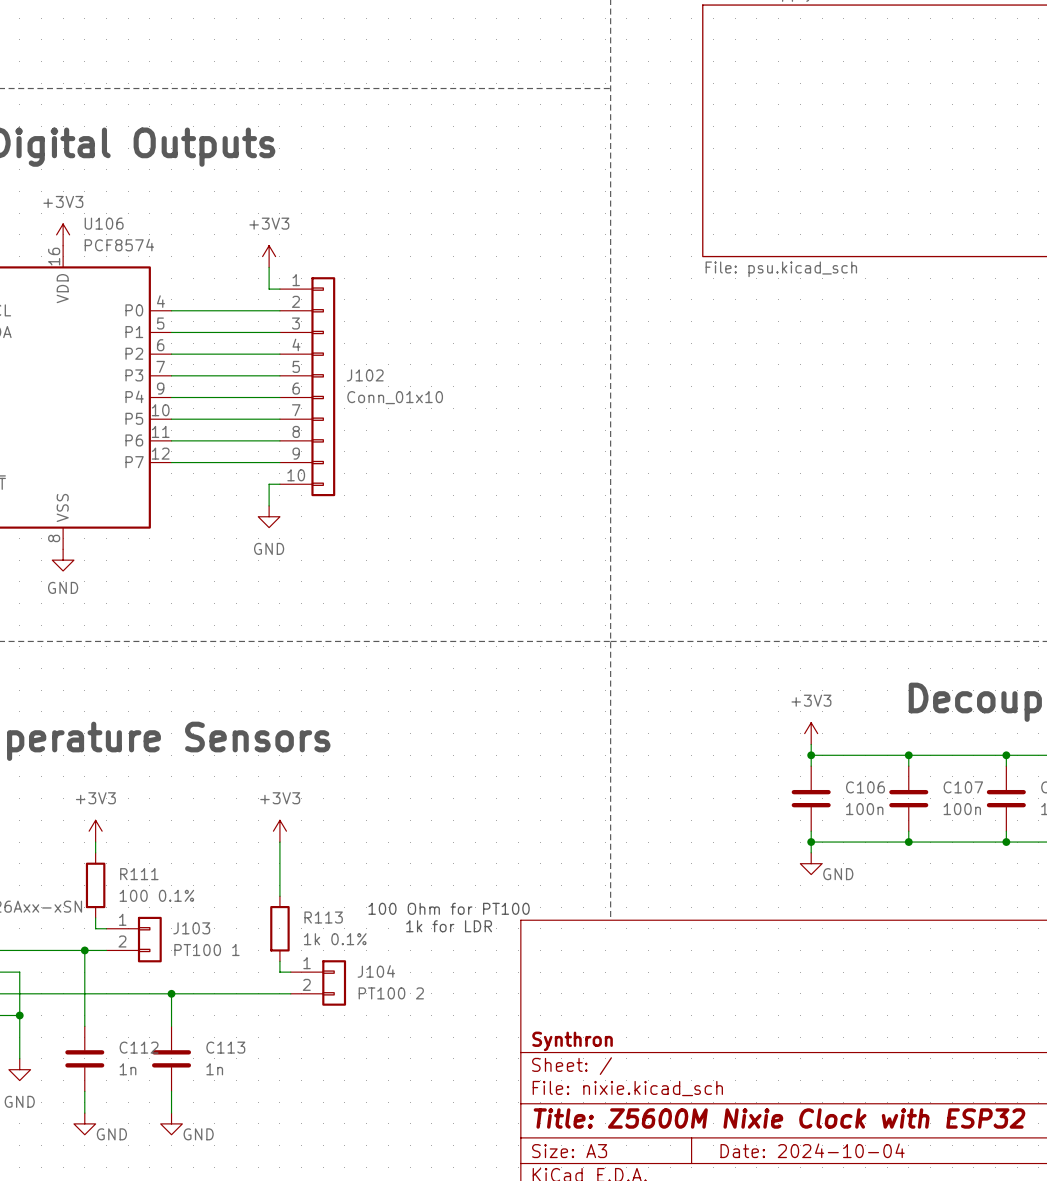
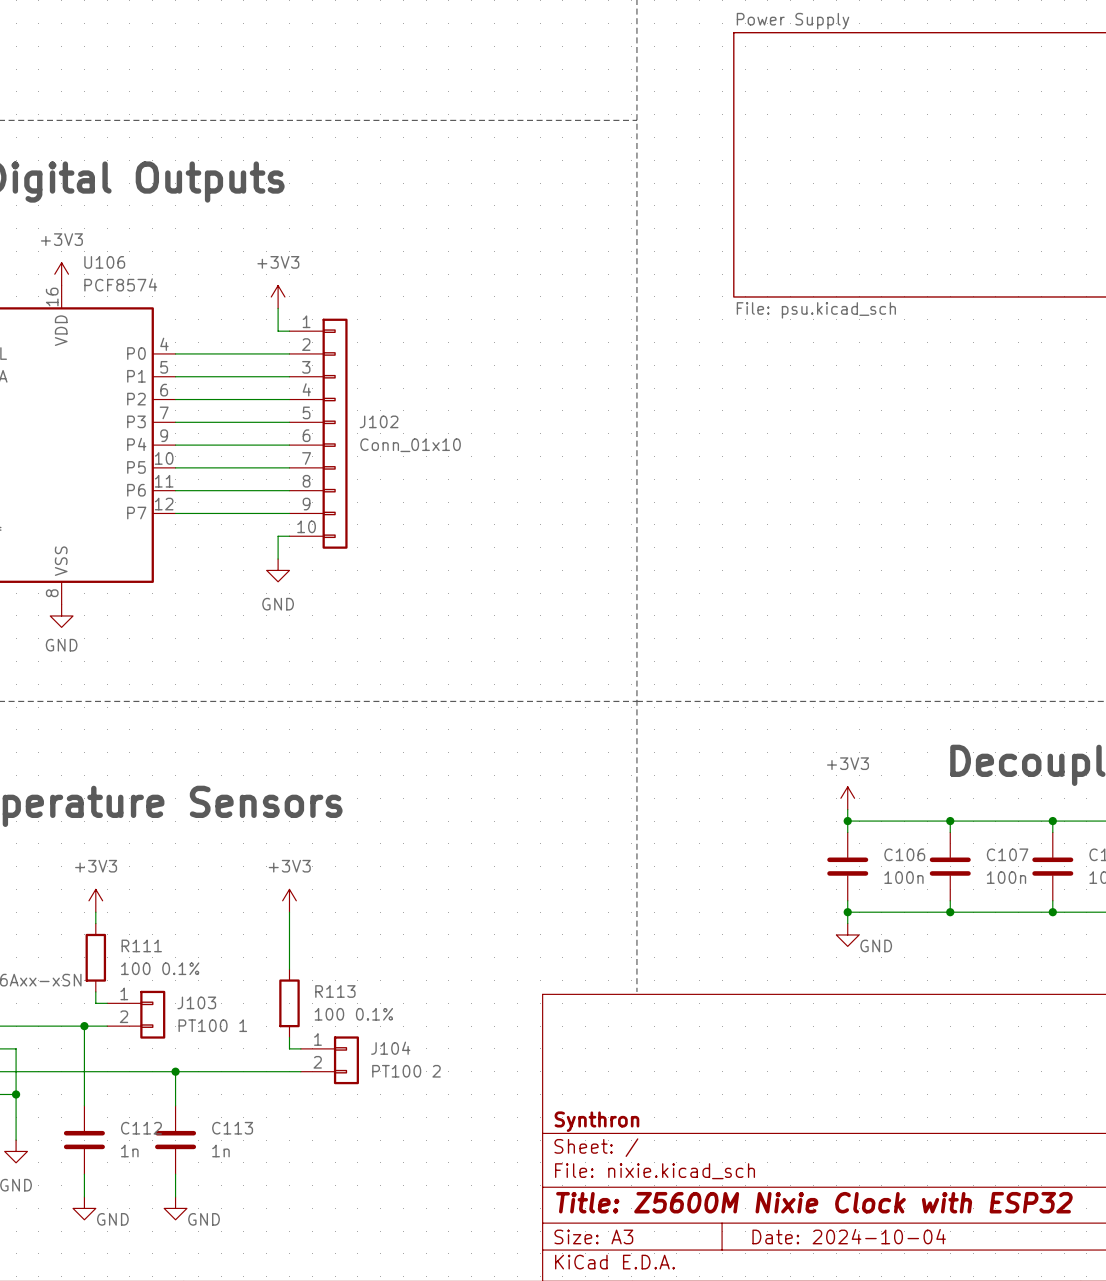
text: 100 Ohm for PT100 (449, 908) -> none
text: 1k for LDR (449, 926) -> none
R113 value: 1k 0.1% (335, 939) -> 100 0.1% (353, 1014)

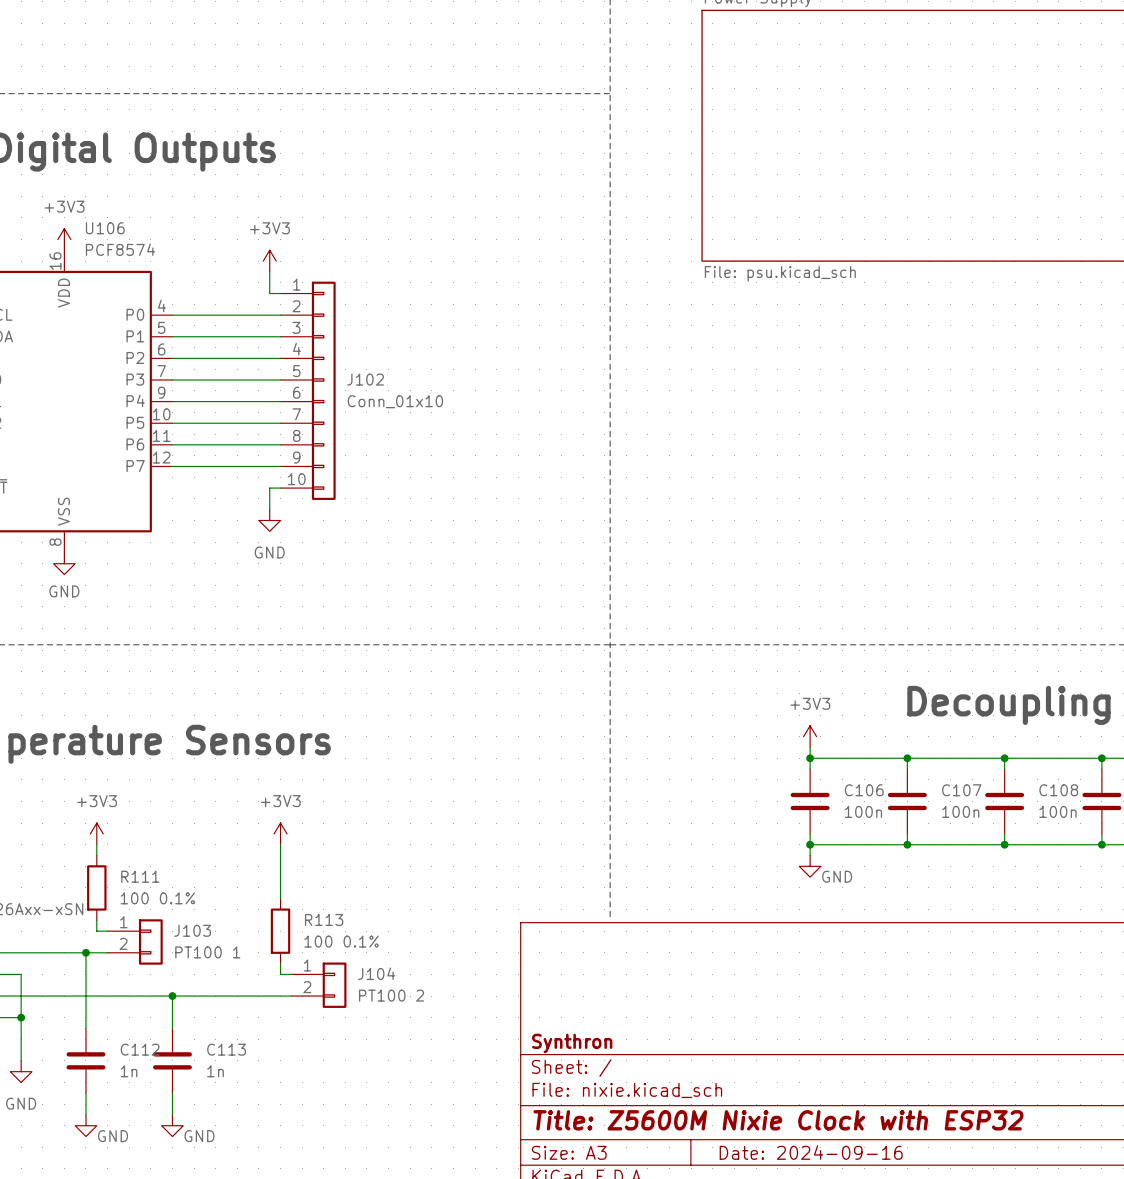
title block: Date: 2024-10-04 (849, 1236) -> Date: 2024-09-16 (811, 1152)

